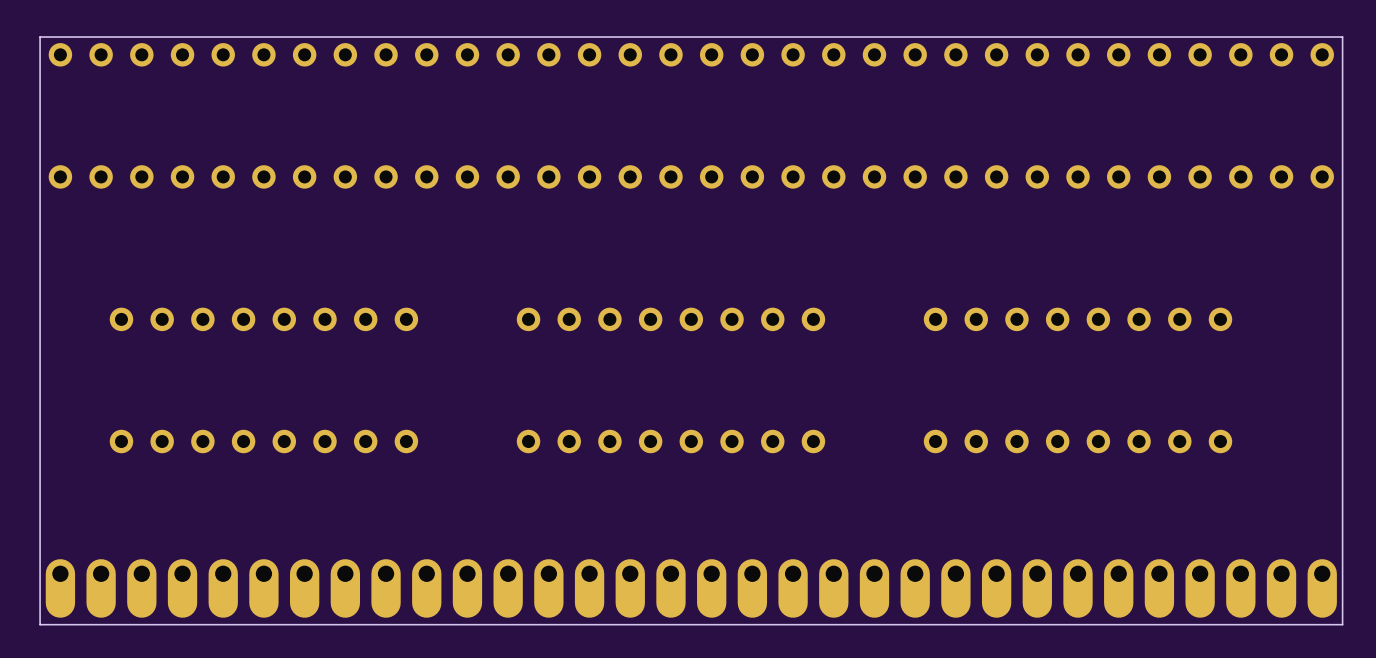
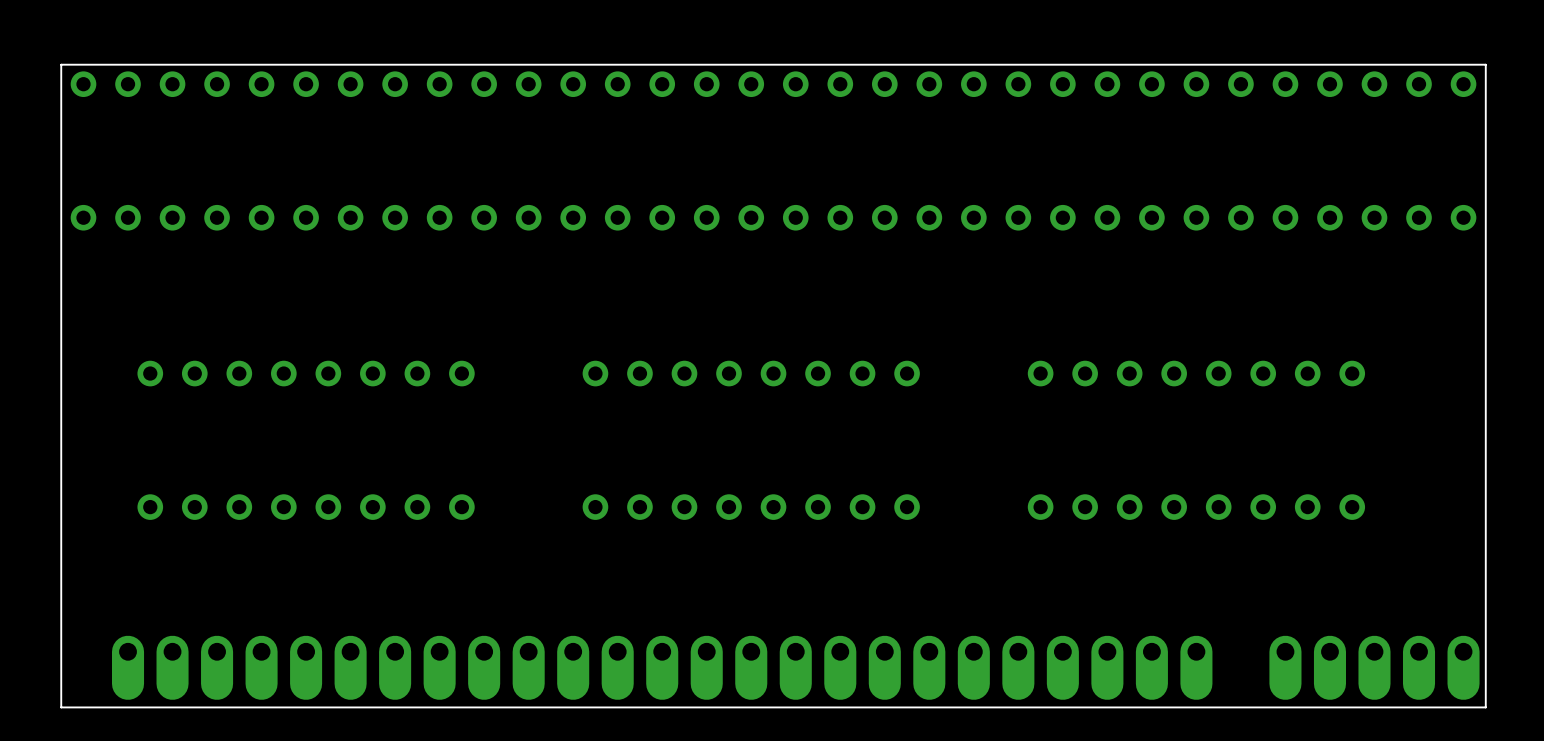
part: (60, 588) -> none
part: (1118, 588) -> none

